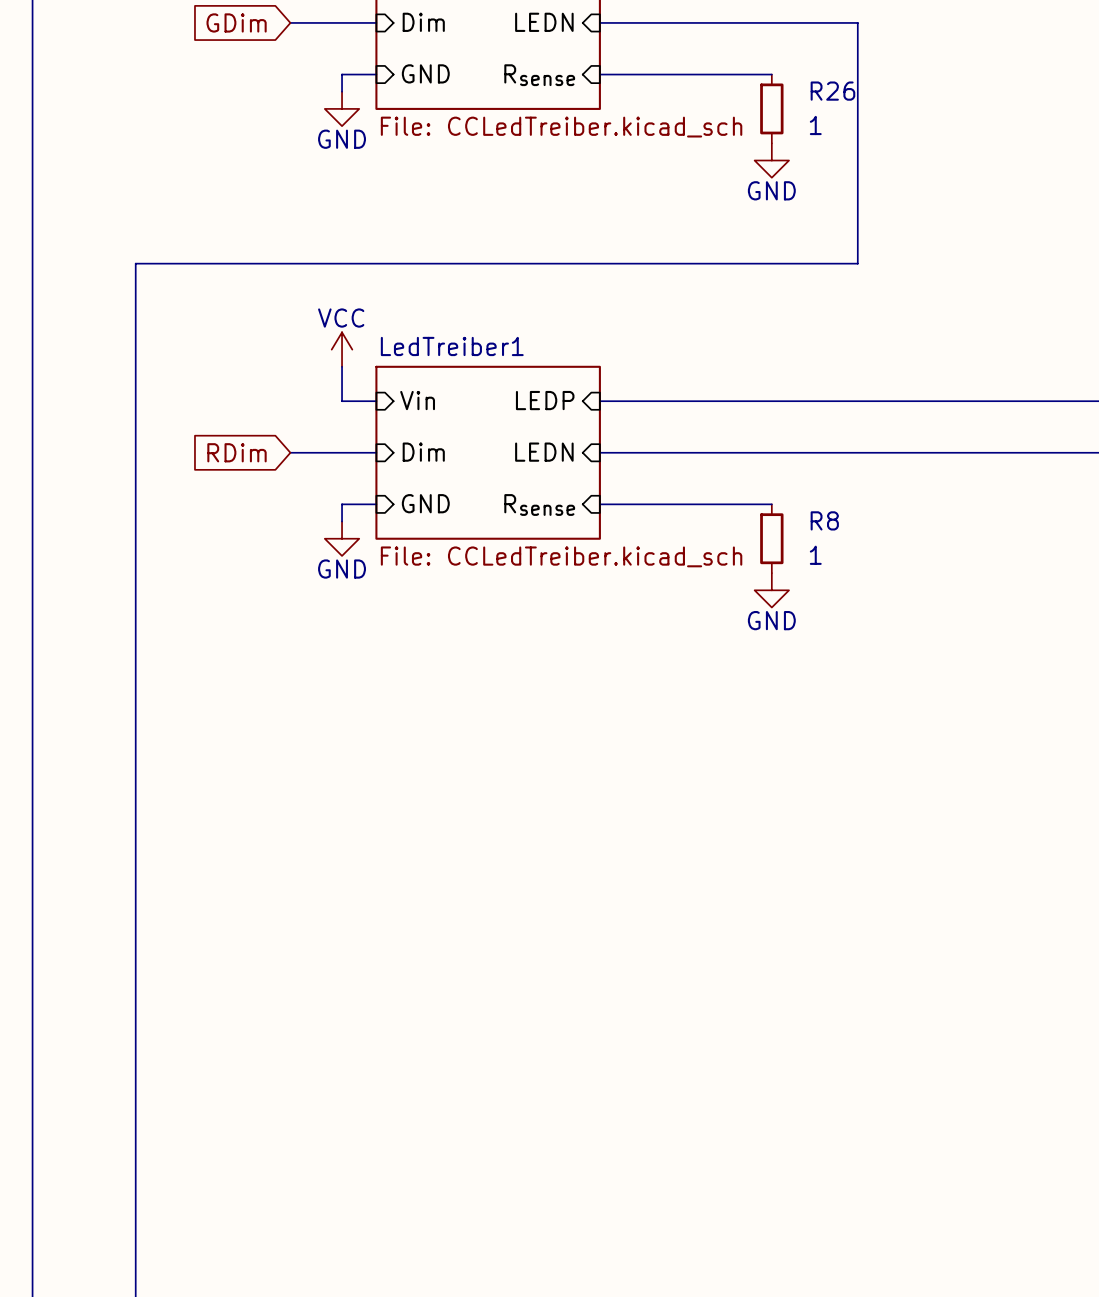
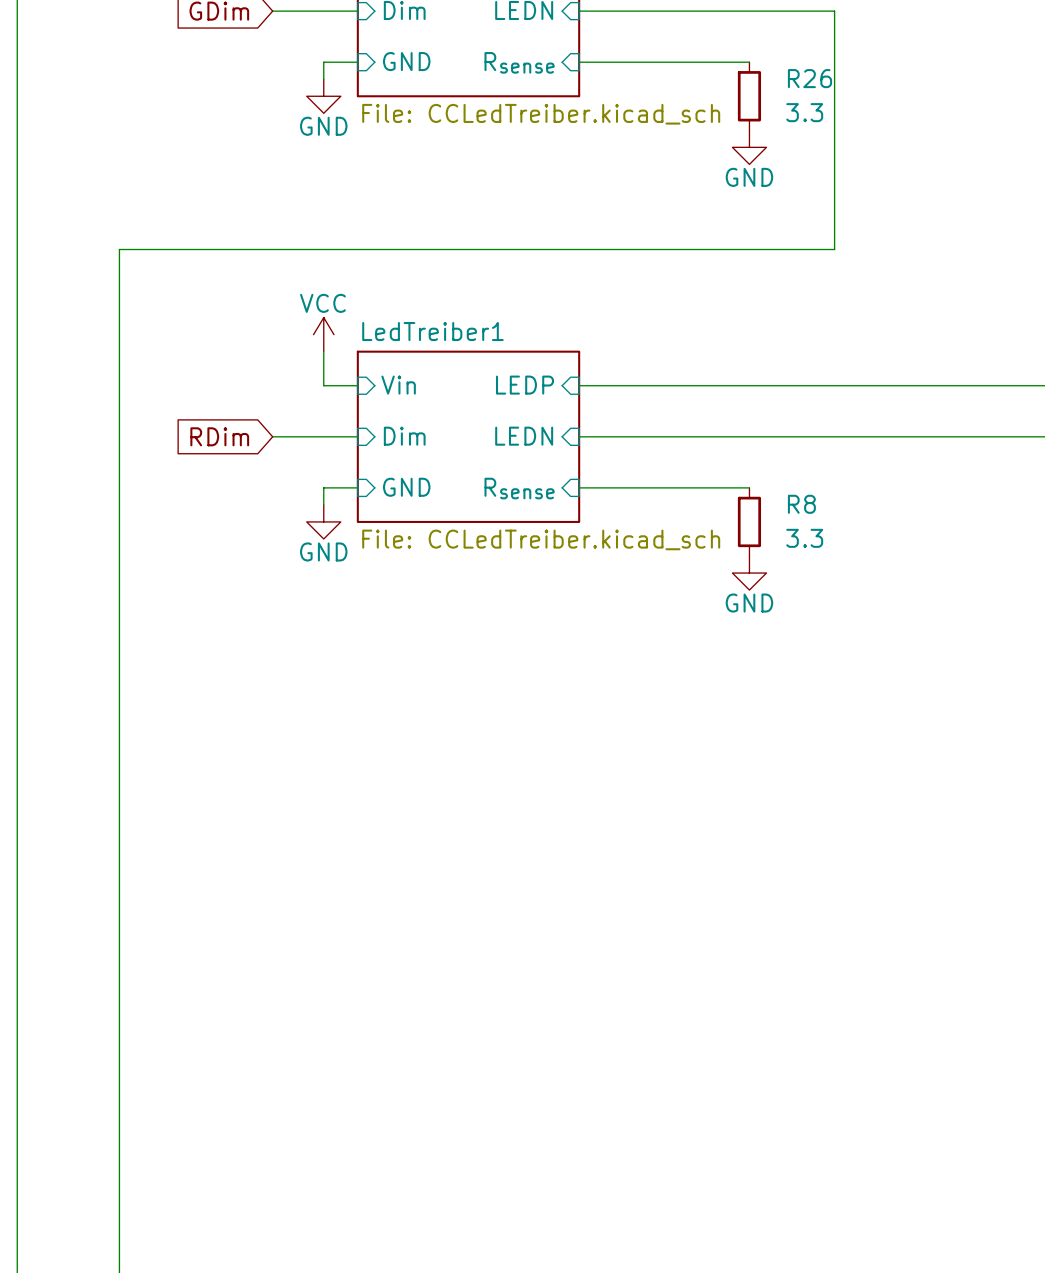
R26 value: 1 (815, 125) -> 3.3 (804, 112)
R8 value: 1 (815, 555) -> 3.3 (804, 538)

